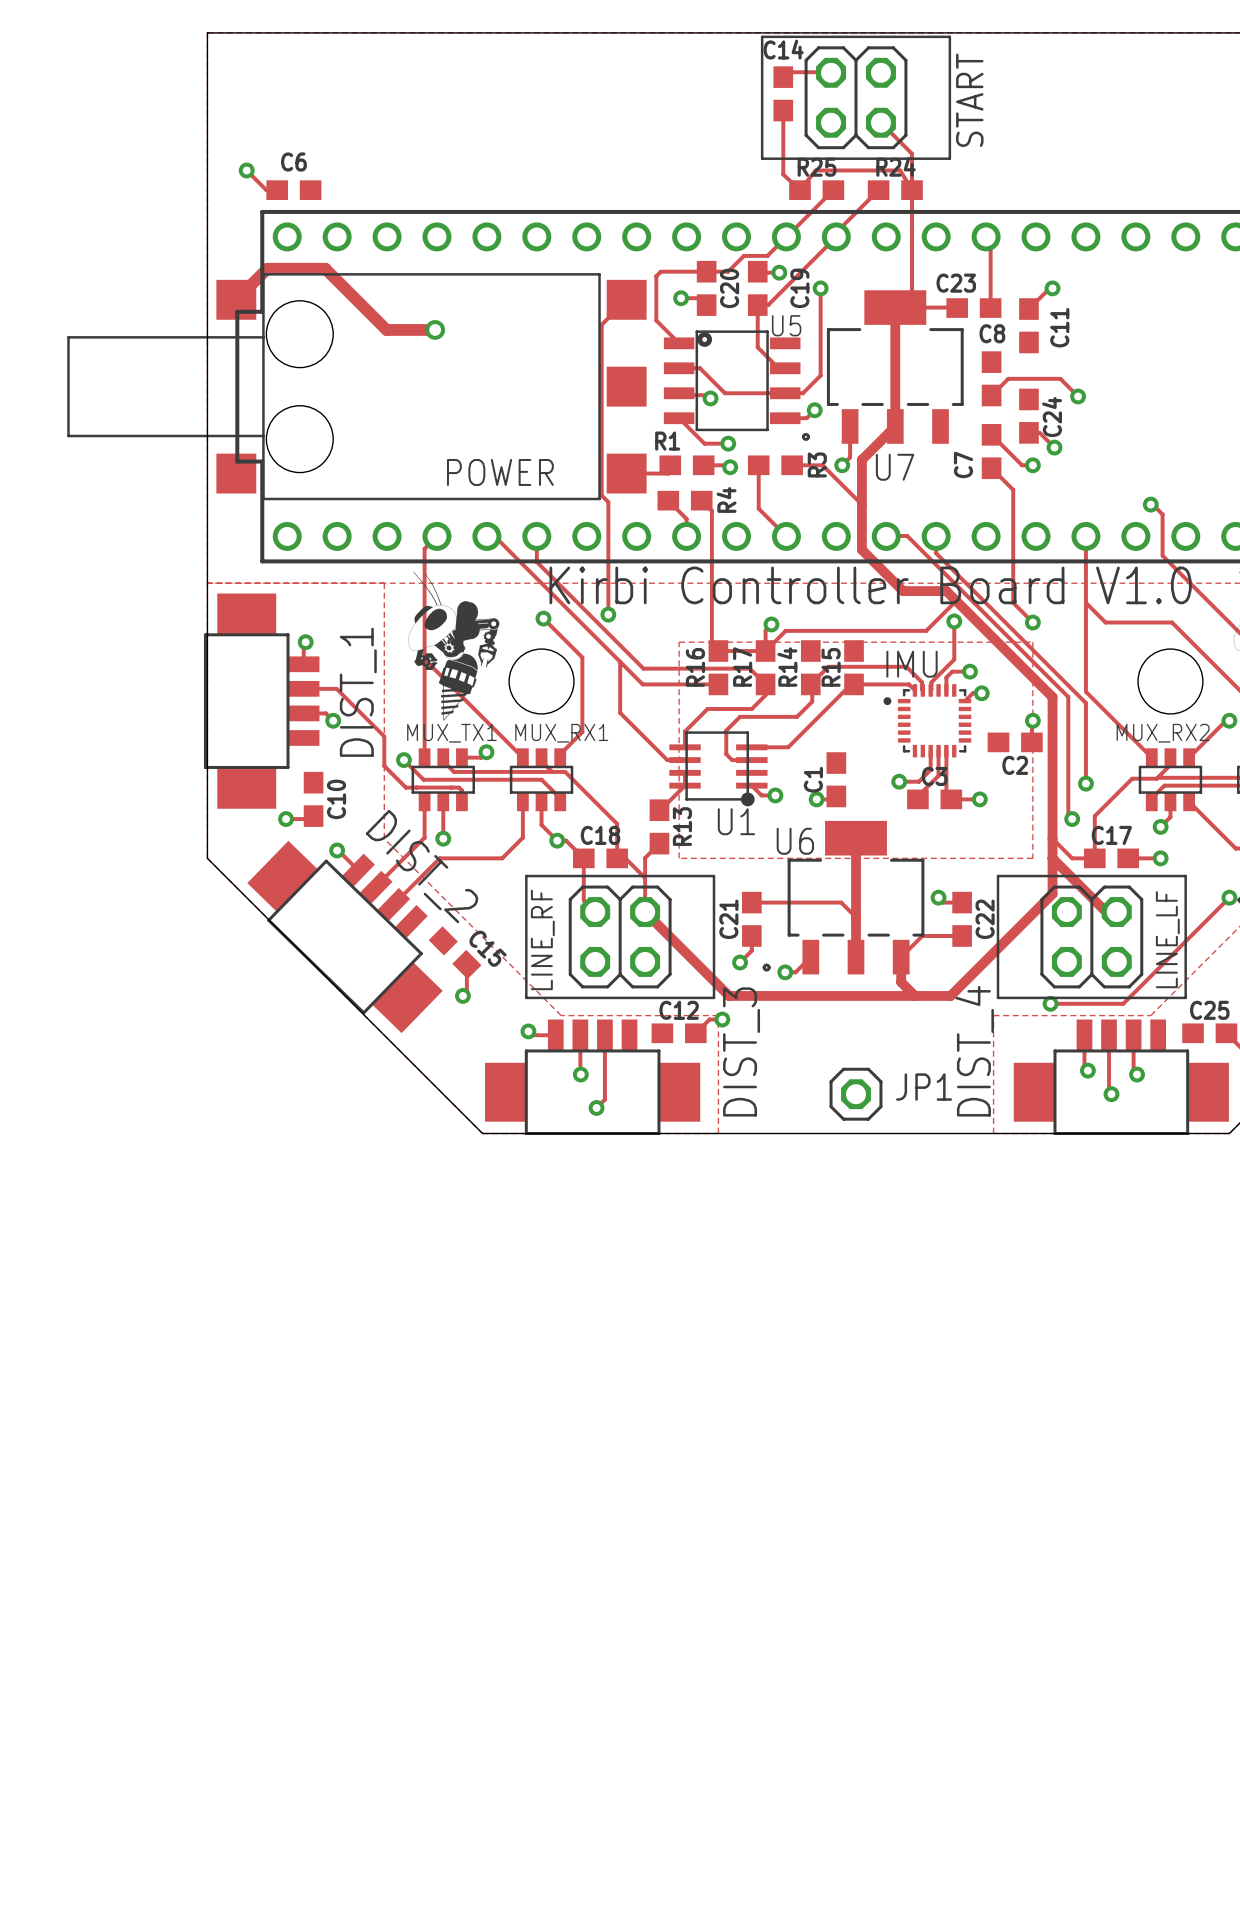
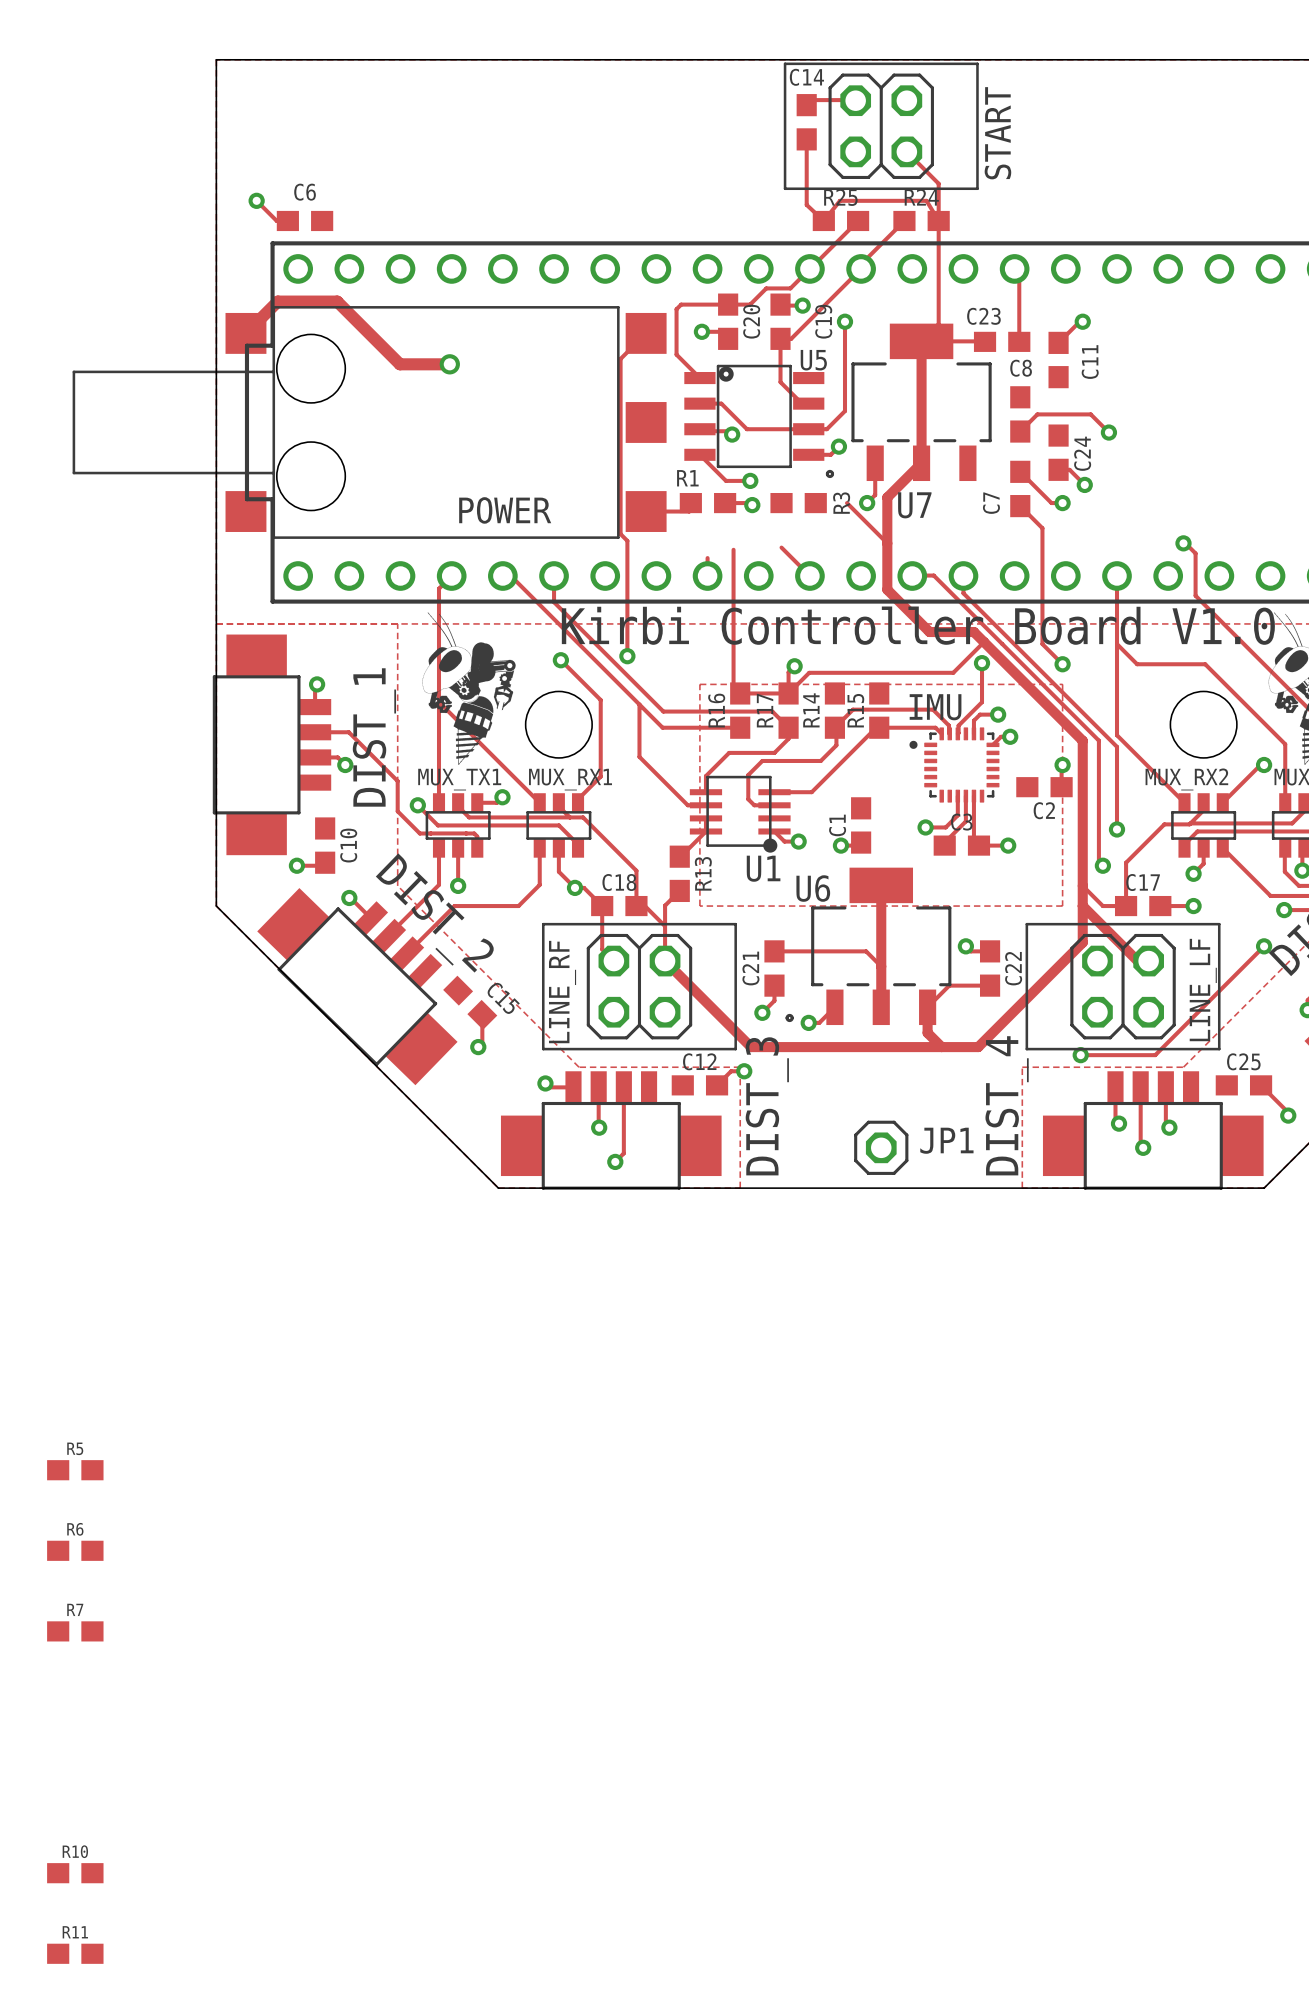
track: (758, 465) (758, 508) -> none
track: (792, 465) (822, 465) -> none
track: (668, 500) (686, 518) -> none
R4: (685, 500) -> none
R5: none -> (75, 1470)
R6: none -> (75, 1550)
R7: none -> (75, 1631)
R10: none -> (75, 1873)
R11: none -> (75, 1953)

